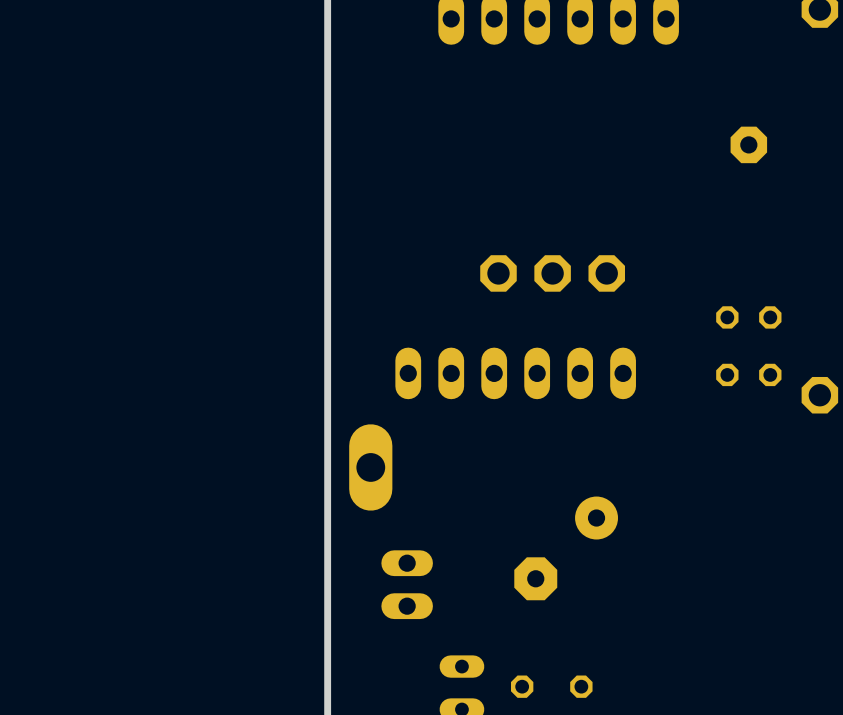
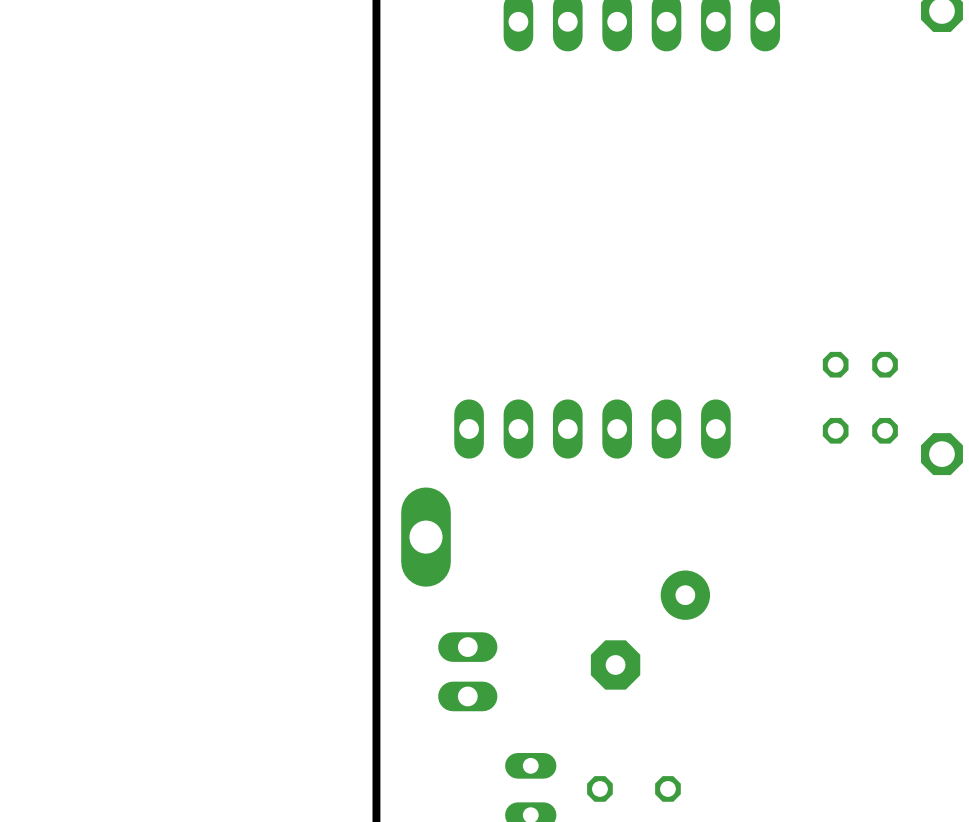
part: (748, 144) -> none
part: (498, 273) -> none
part: (552, 273) -> none
part: (606, 273) -> none

